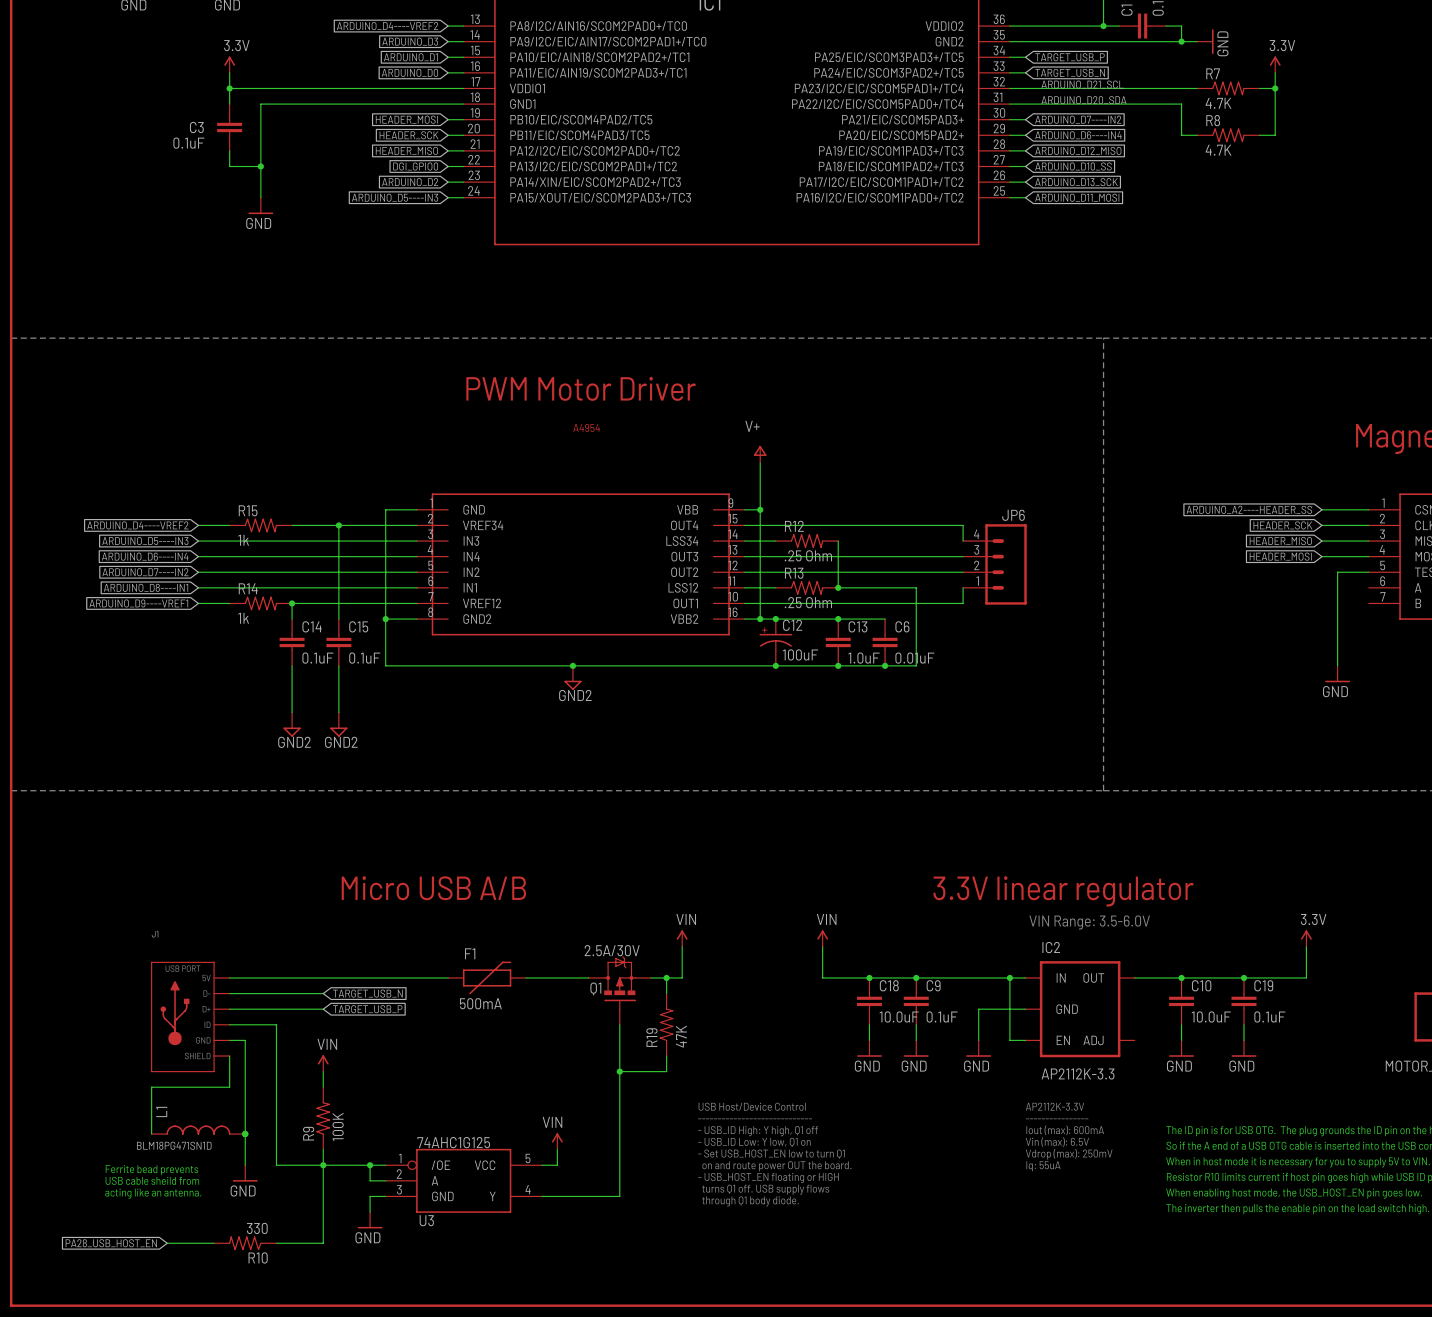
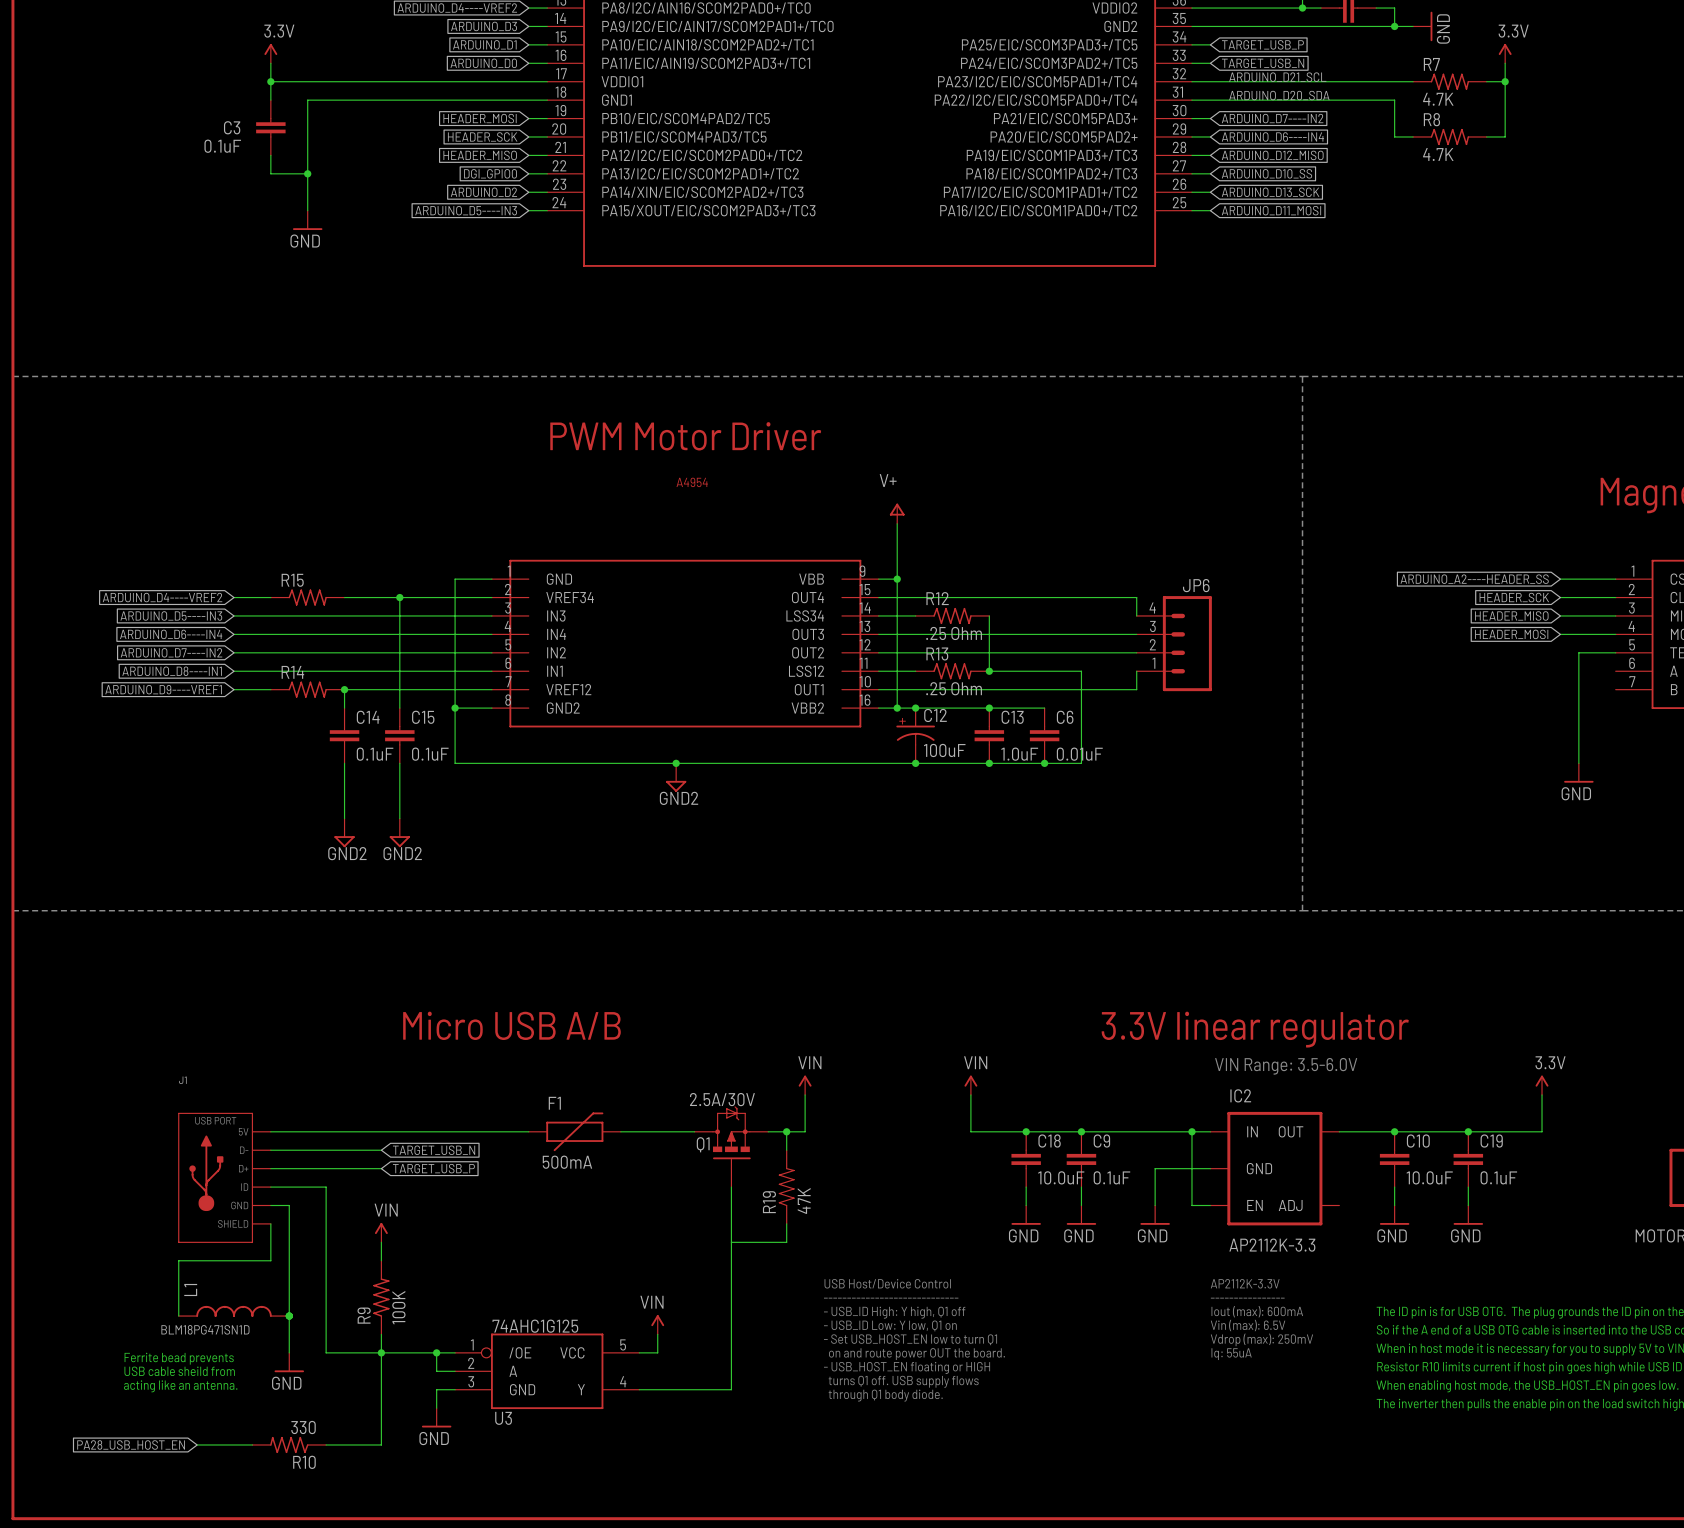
R15 value: 1k (243, 540) -> none
R14 value: 1k (243, 618) -> none
junction: (619, 1071) -> none

